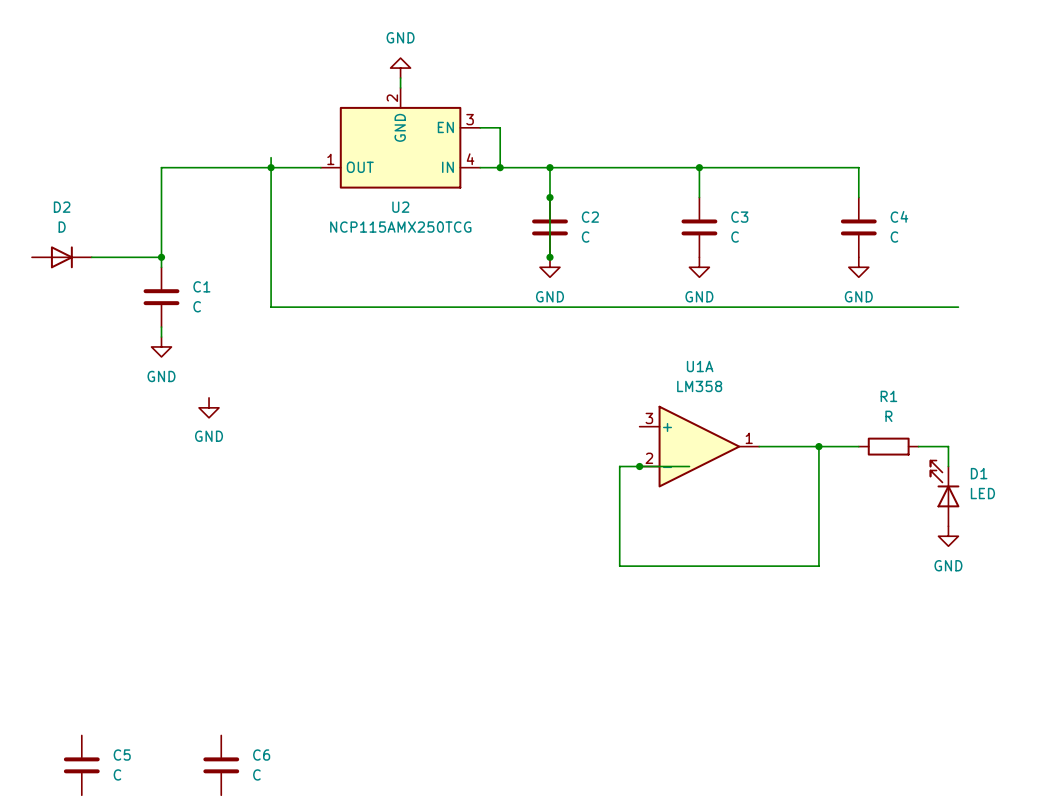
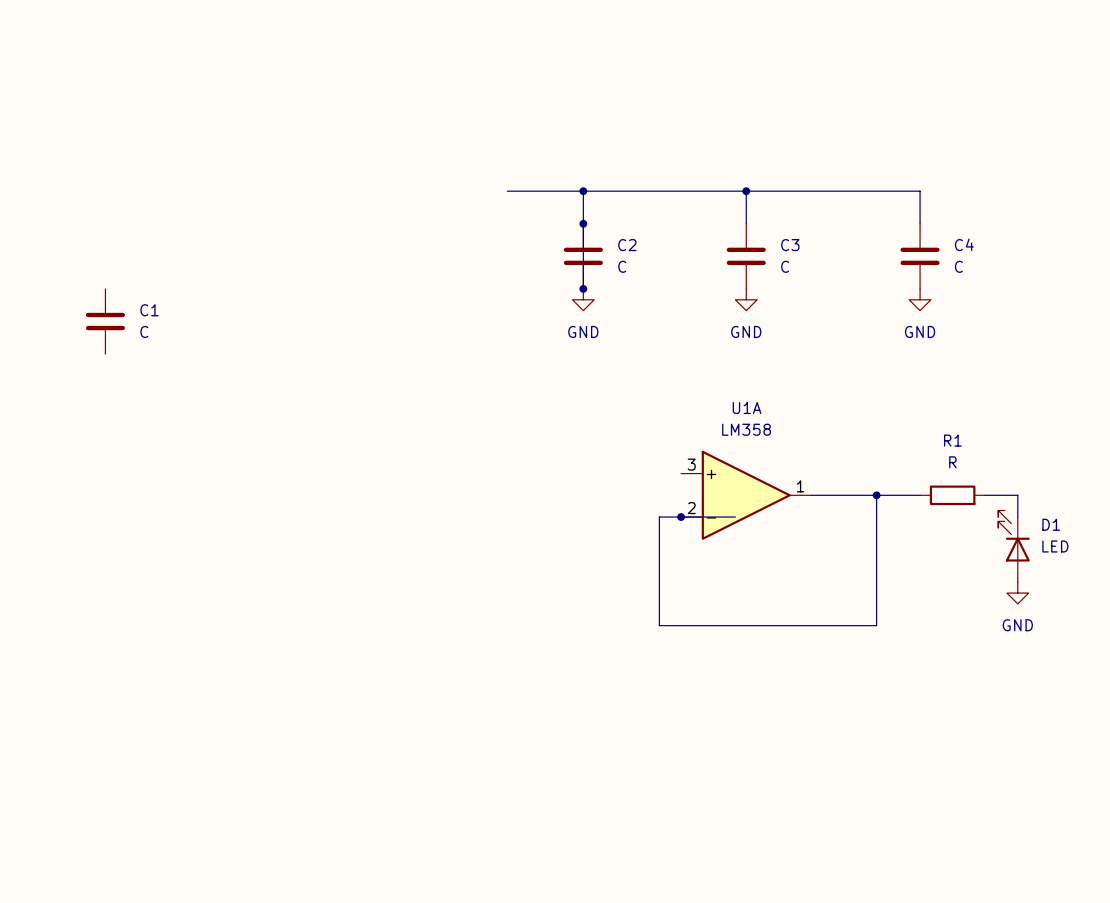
power symbol: GND (400, 68) -> none
wire: (400, 78) (400, 87) -> none
wire: (480, 127) (500, 127) (500, 167) -> none
U2: NCP115AMX250TCG (400, 138) -> none
wire: (271, 157) (271, 307) (958, 307) -> none
junction: (271, 167) -> none
wire: (320, 167) (161, 167) (161, 267) -> none
junction: (500, 167) -> none
D2: D (61, 257) -> none
wire: (91, 257) (161, 257) -> none
junction: (161, 257) -> none
C1 position: (161, 297) -> (105, 321)
wire: (161, 327) (161, 337) -> none
power symbol: GND (161, 346) -> none
power symbol: GND (209, 407) -> none
C5: C (81, 765) -> none
C6: C (221, 765) -> none

